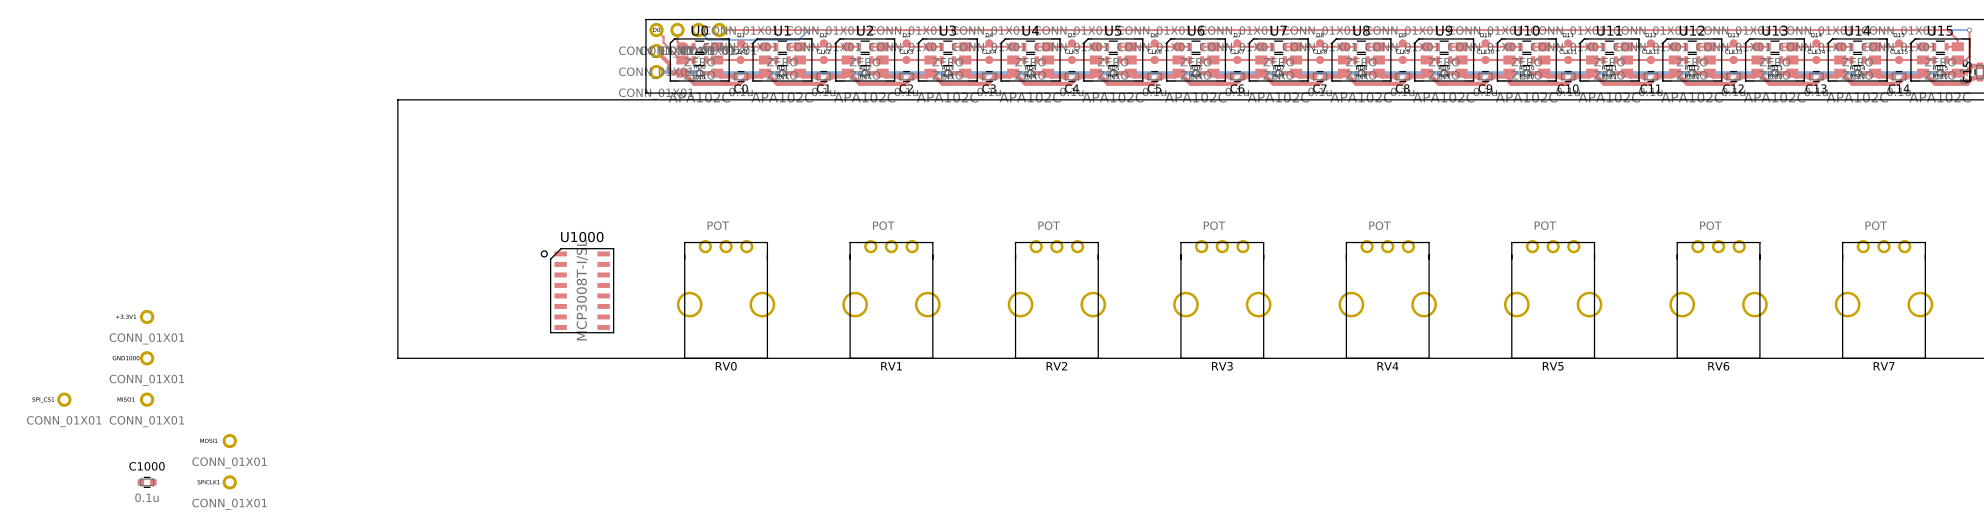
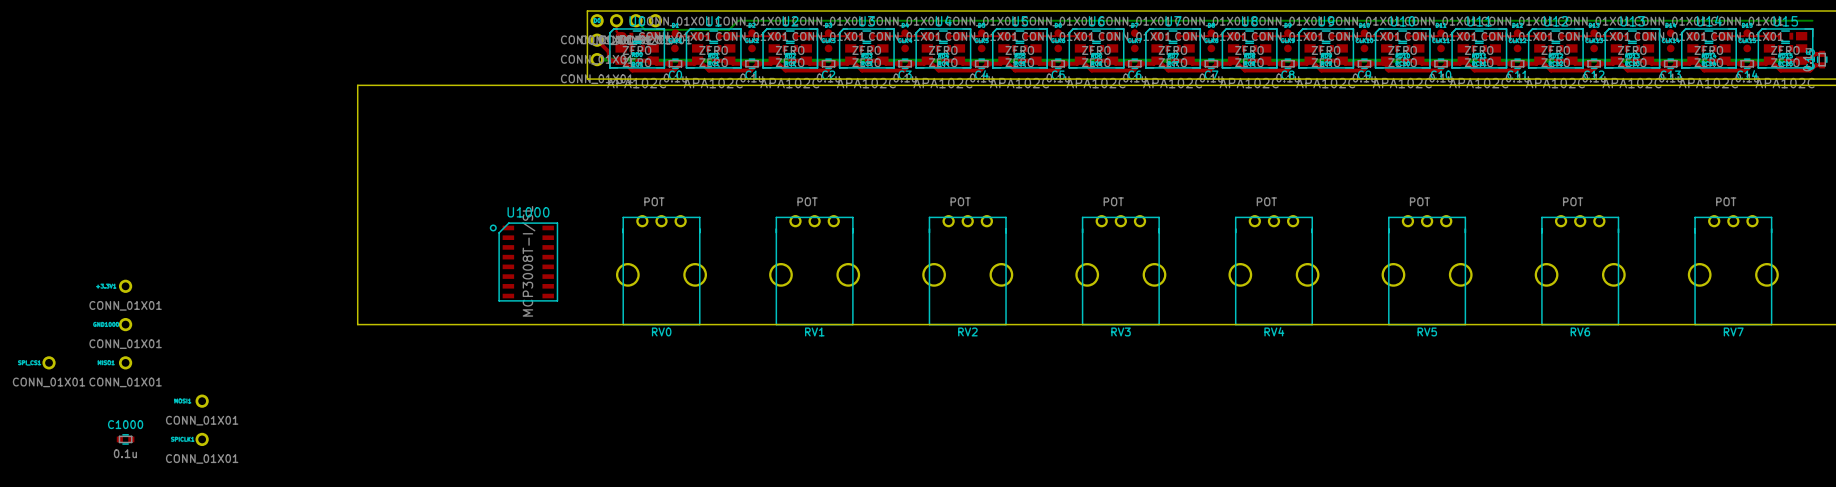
top track: (656, 30) (663, 37) (663, 42) (680, 59) (693, 59) -> none
top track: (719, 30) (1947, 30) (1957, 40) (1957, 46) (1946, 46) -> none
top track: (1969, 30) (1969, 56) (1965, 59) (1946, 59) -> none
via: (1969, 30) -> none
top track: (1202, 46) (1234, 46) (1237, 43) (1240, 46) (1272, 46) -> none
top track: (1781, 46) (1813, 46) (1816, 43) (1819, 46) (1851, 46) -> none
top track: (705, 59) (776, 59) -> none
top track: (788, 59) (858, 59) -> none
top track: (871, 59) (941, 59) -> none
top track: (954, 59) (1024, 59) -> none
top track: (1036, 59) (1107, 59) -> none
top track: (1119, 59) (1189, 59) -> none
top track: (1202, 59) (1272, 59) -> none
top track: (1284, 59) (1355, 59) -> none
top track: (1367, 59) (1437, 59) -> none
top track: (1450, 59) (1520, 59) -> none
top track: (1533, 59) (1603, 59) -> none
top track: (1615, 59) (1686, 59) -> none
top track: (1698, 59) (1768, 59) -> none
top track: (1781, 59) (1851, 59) -> none
top track: (1863, 59) (1934, 59) -> none
via: (699, 73) -> none
via: (782, 73) -> none
via: (865, 73) -> none
via: (947, 73) -> none
via: (1030, 73) -> none
via: (1113, 73) -> none
via: (1196, 73) -> none
via: (1278, 73) -> none
via: (1361, 73) -> none
via: (1444, 73) -> none
via: (1526, 73) -> none
via: (1609, 73) -> none
via: (1692, 73) -> none
via: (1774, 73) -> none
via: (1857, 73) -> none
via: (1940, 73) -> none

